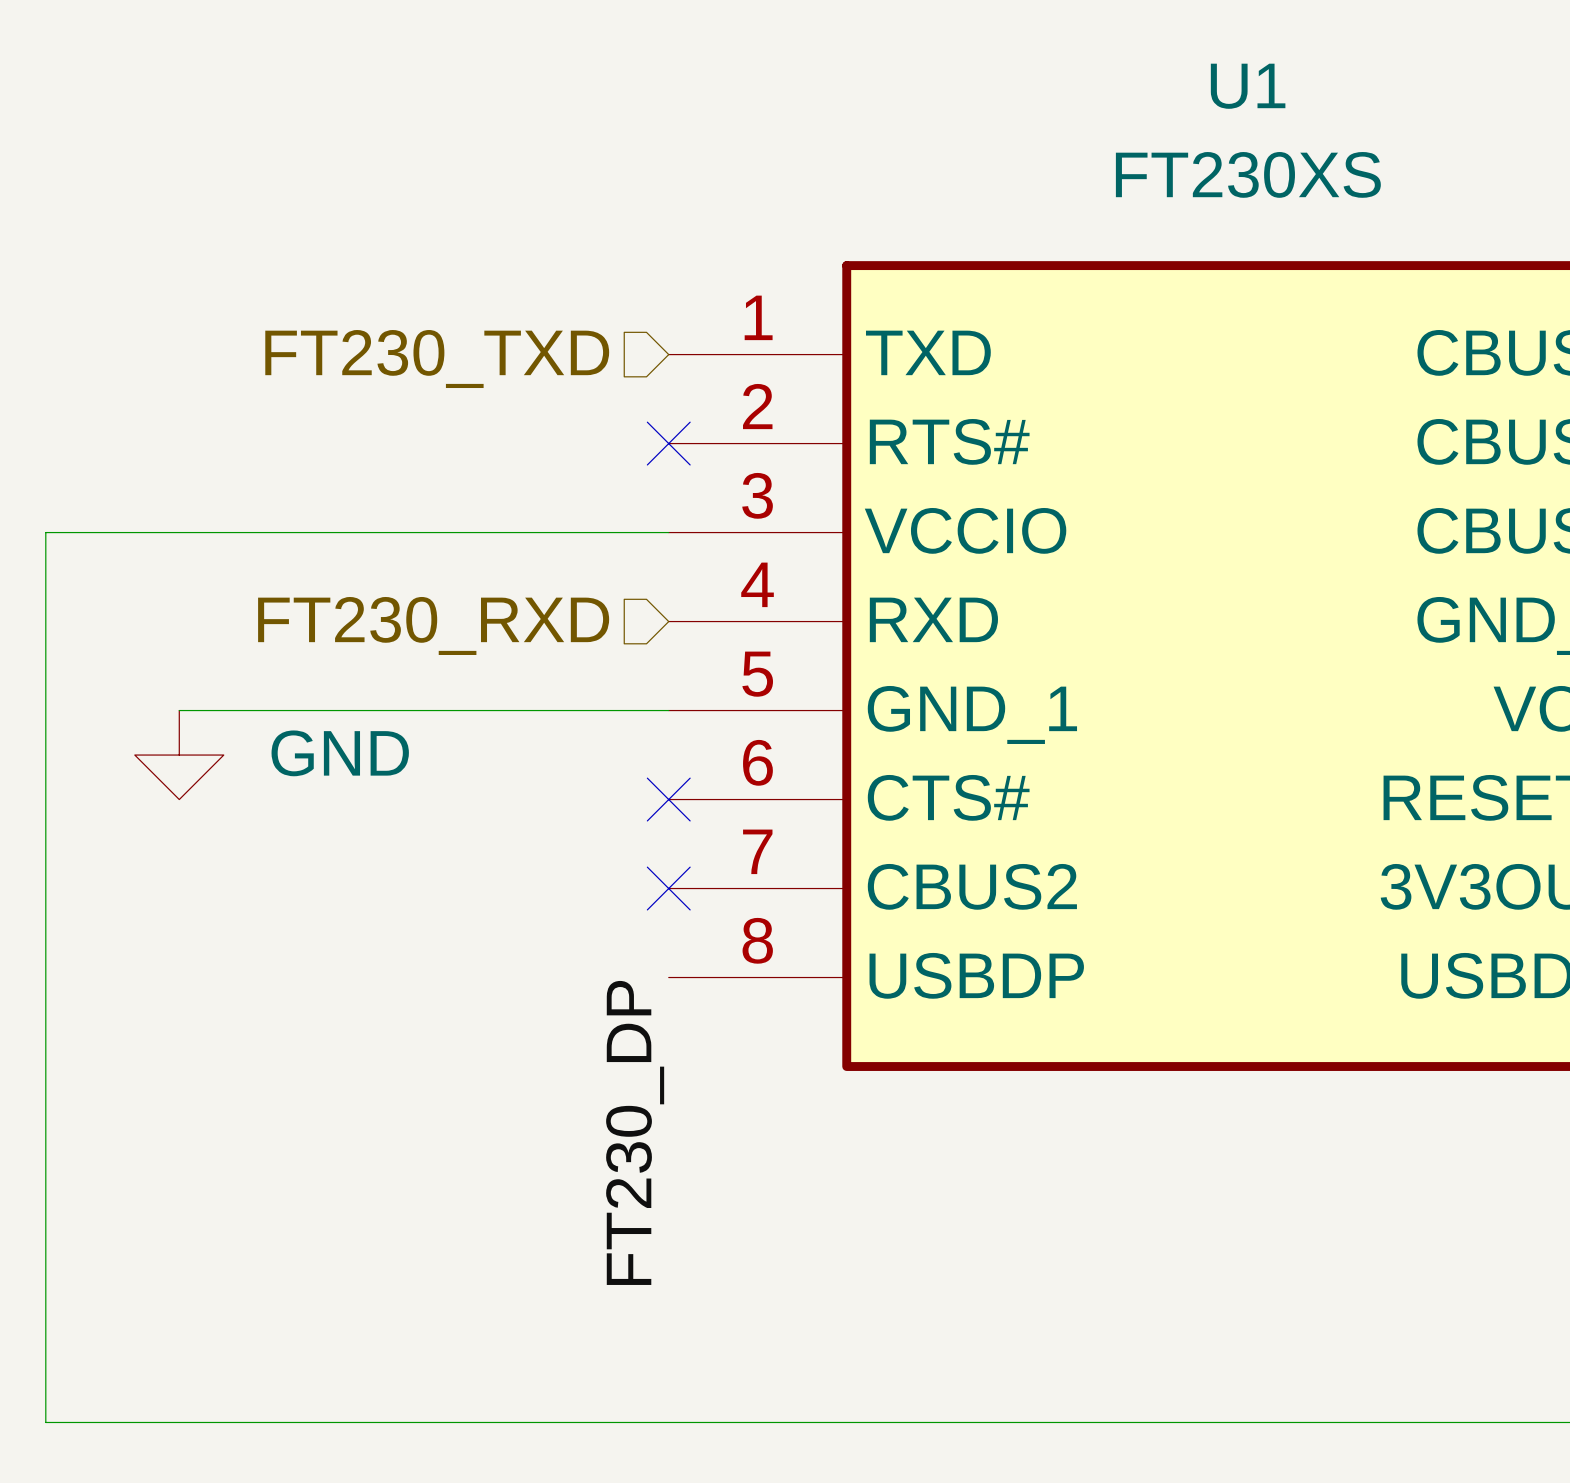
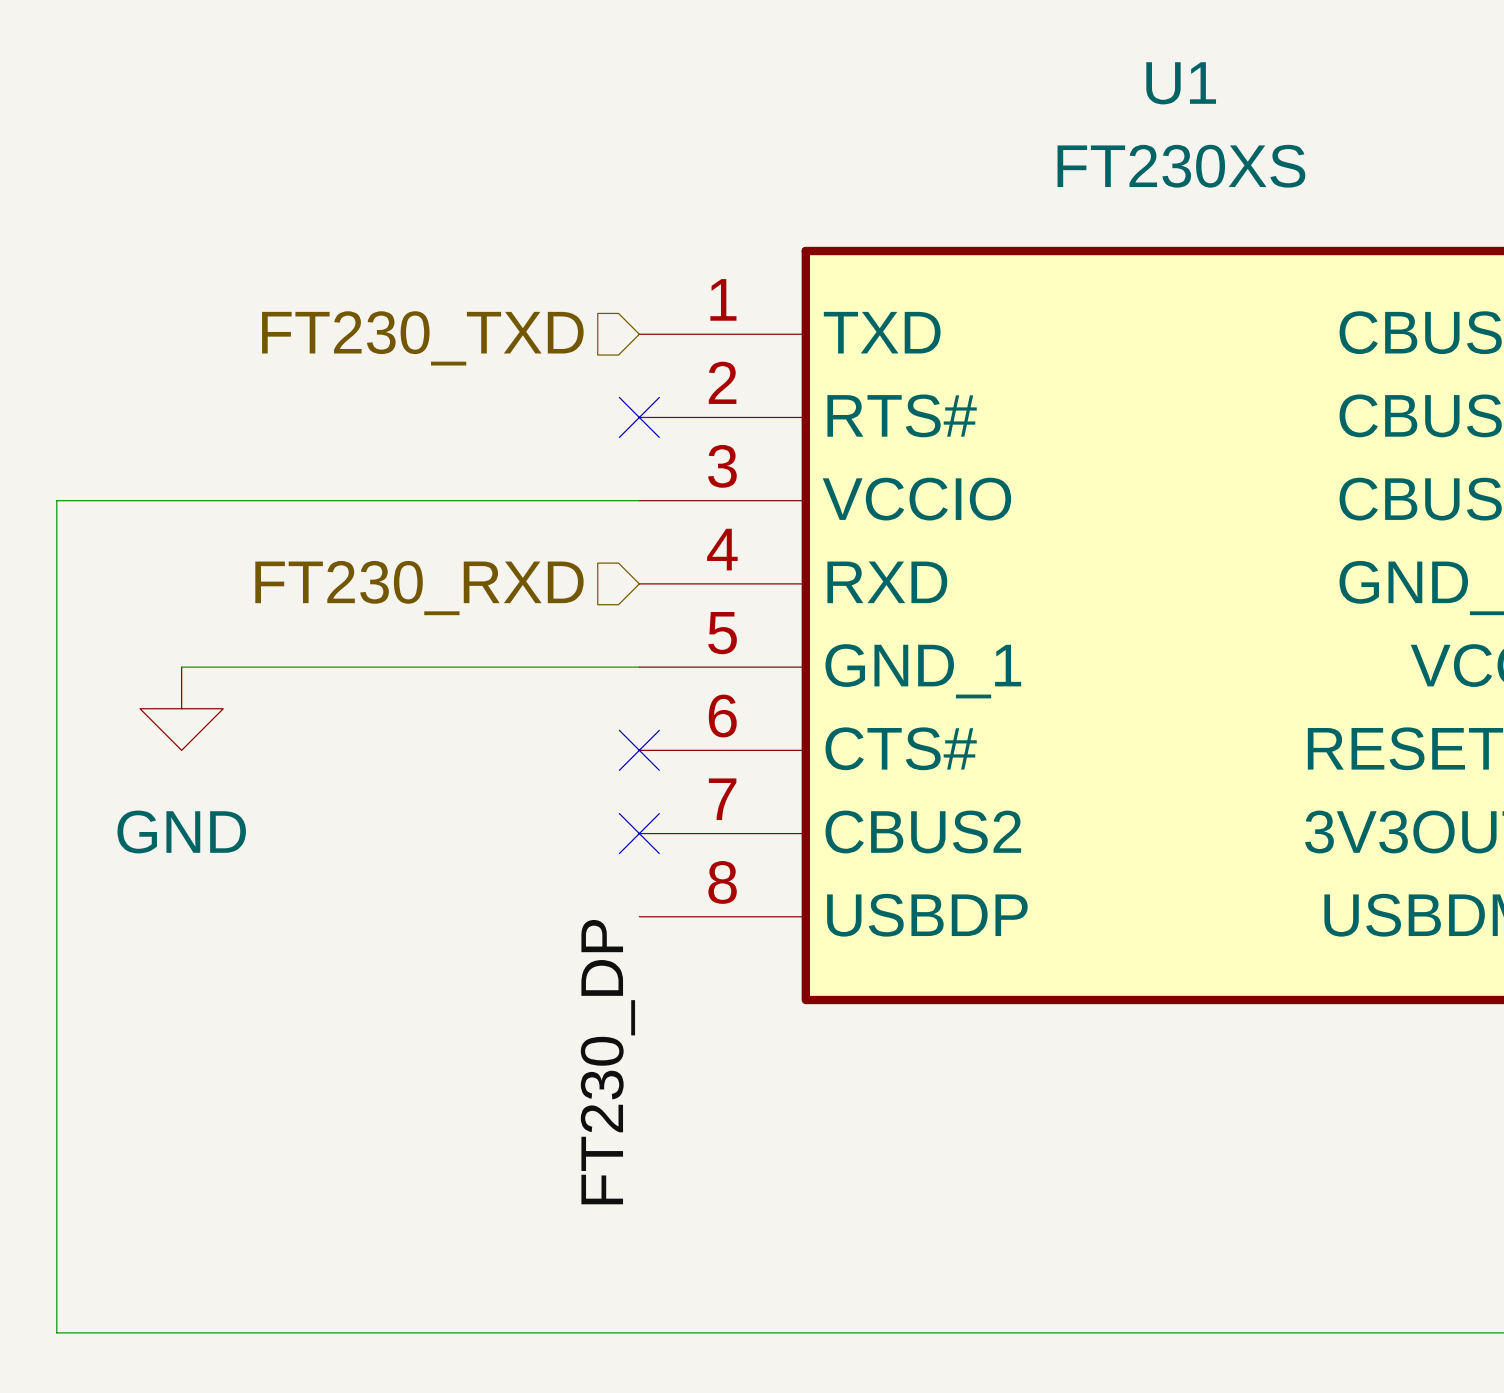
power symbol text position: GND (340, 753) -> GND (181, 832)

